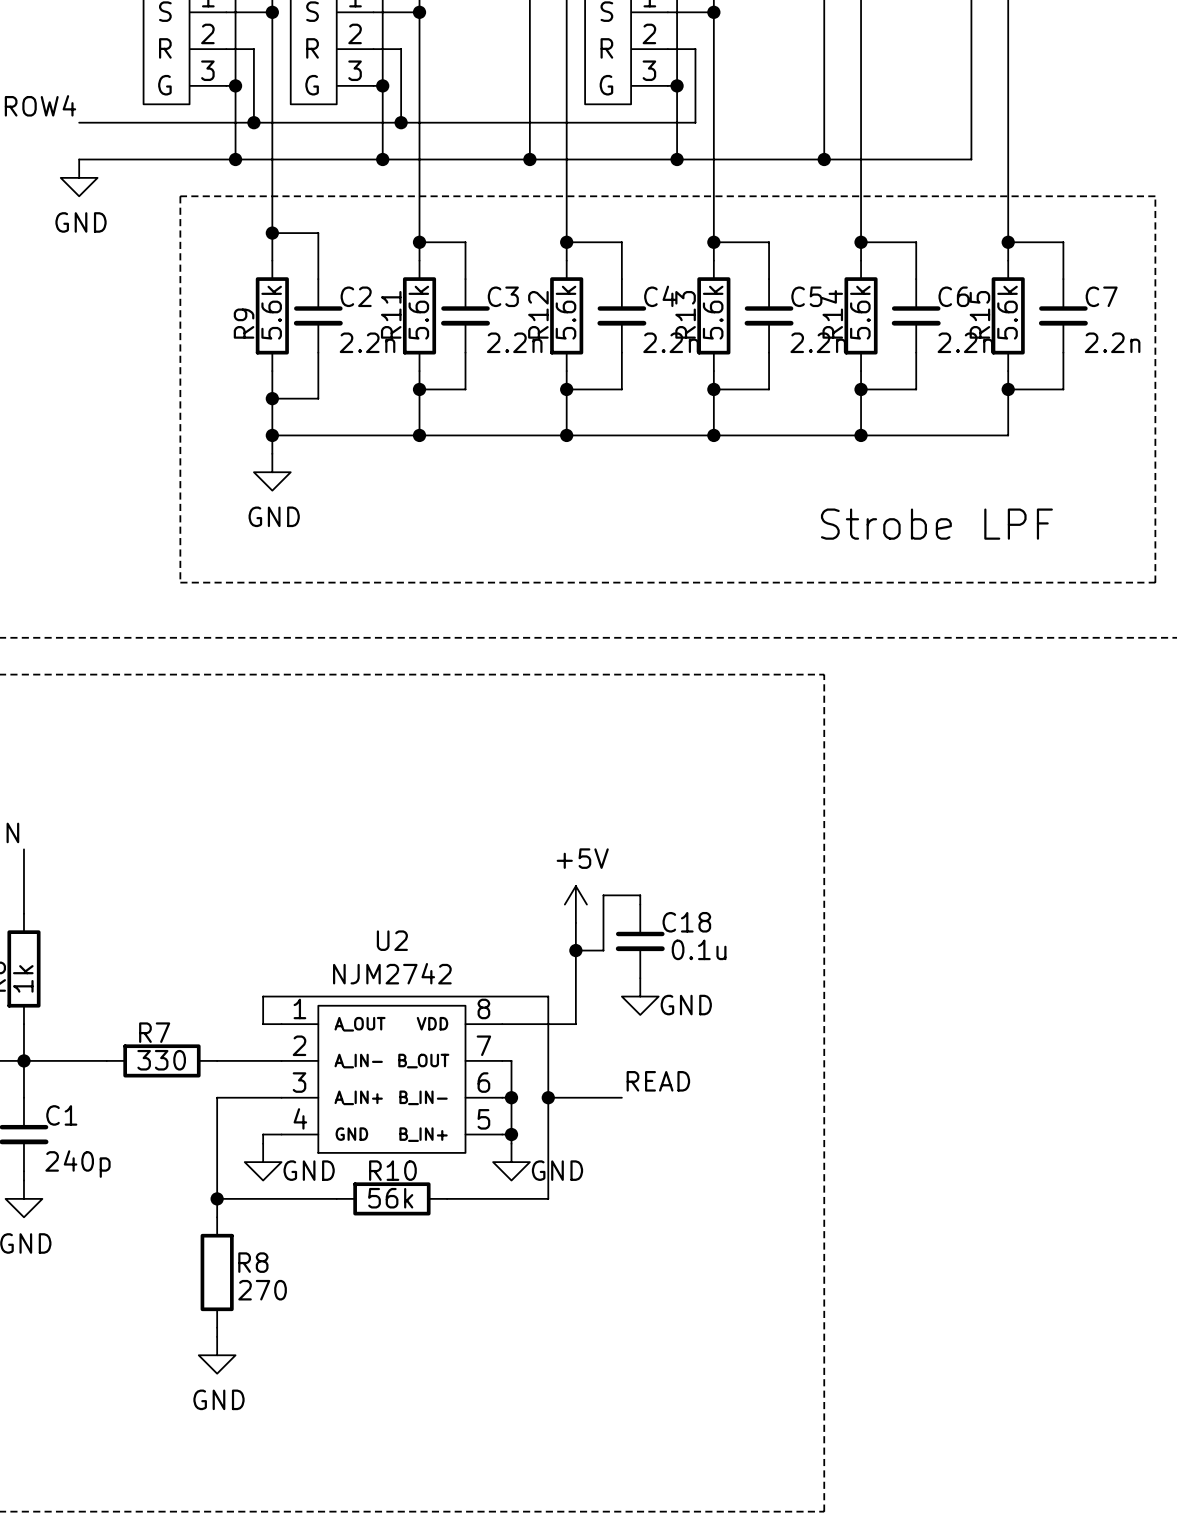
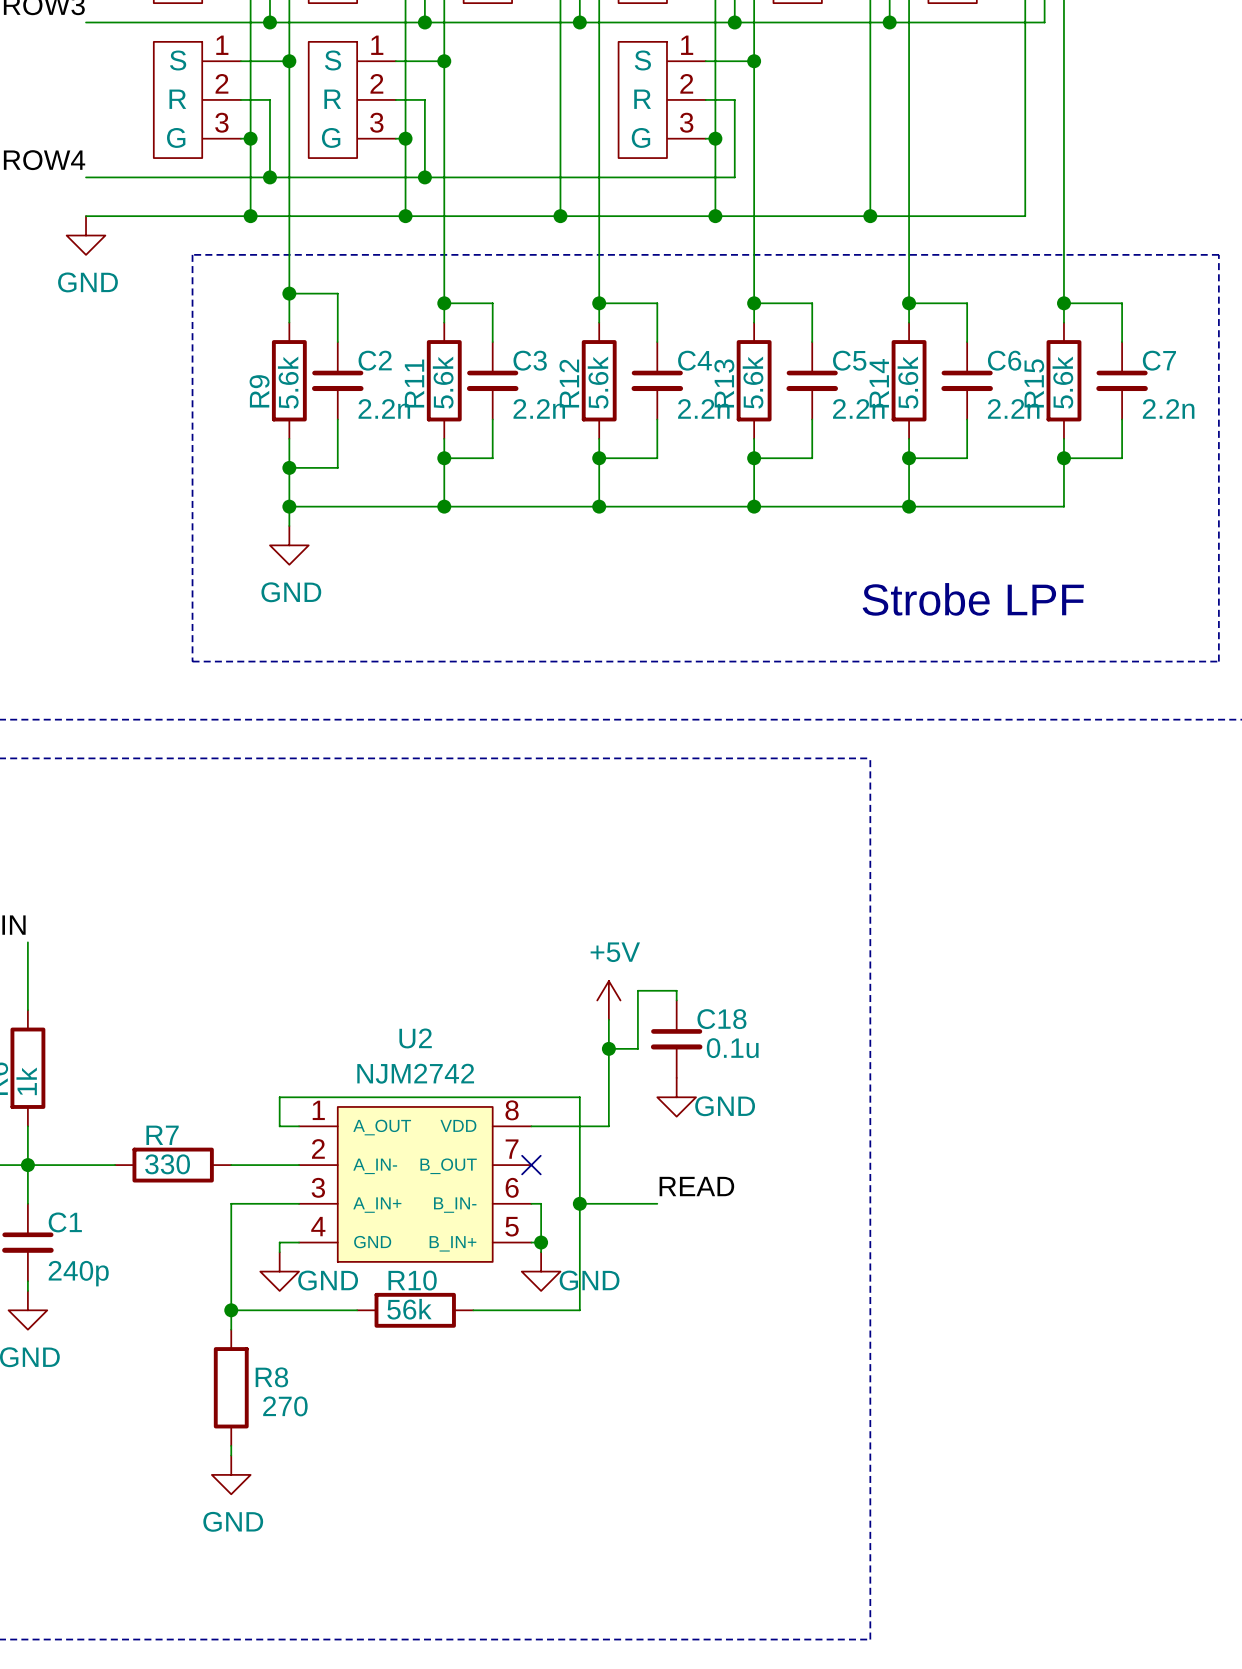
wire: (502, 1060) (511, 1060) (511, 1097) -> none
no-connect mark: none -> (531, 1165)
junction: (511, 1097) -> none

